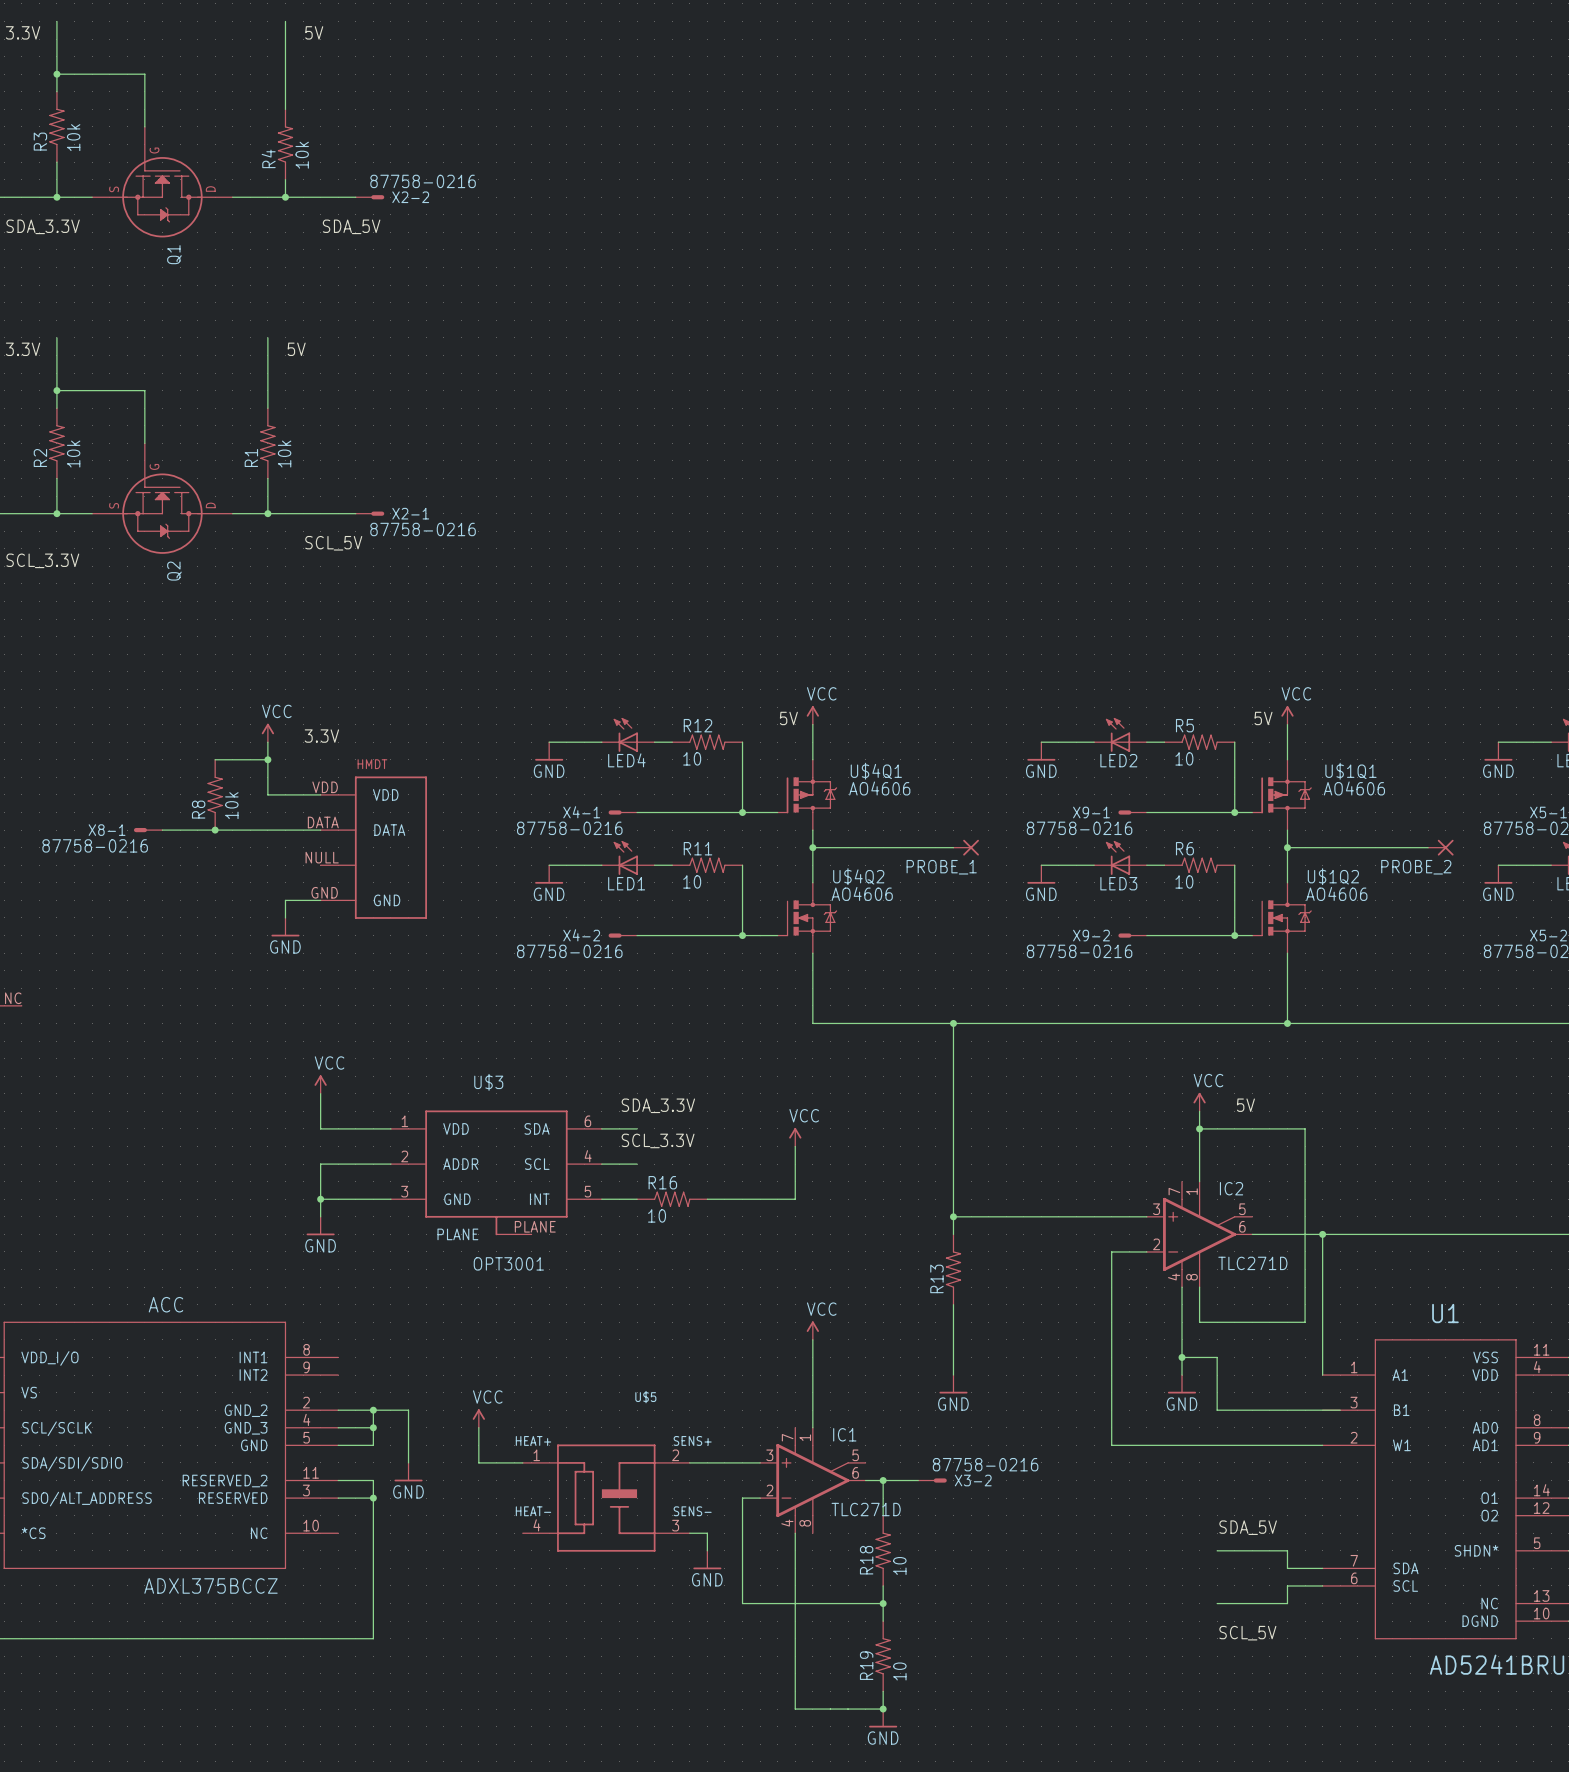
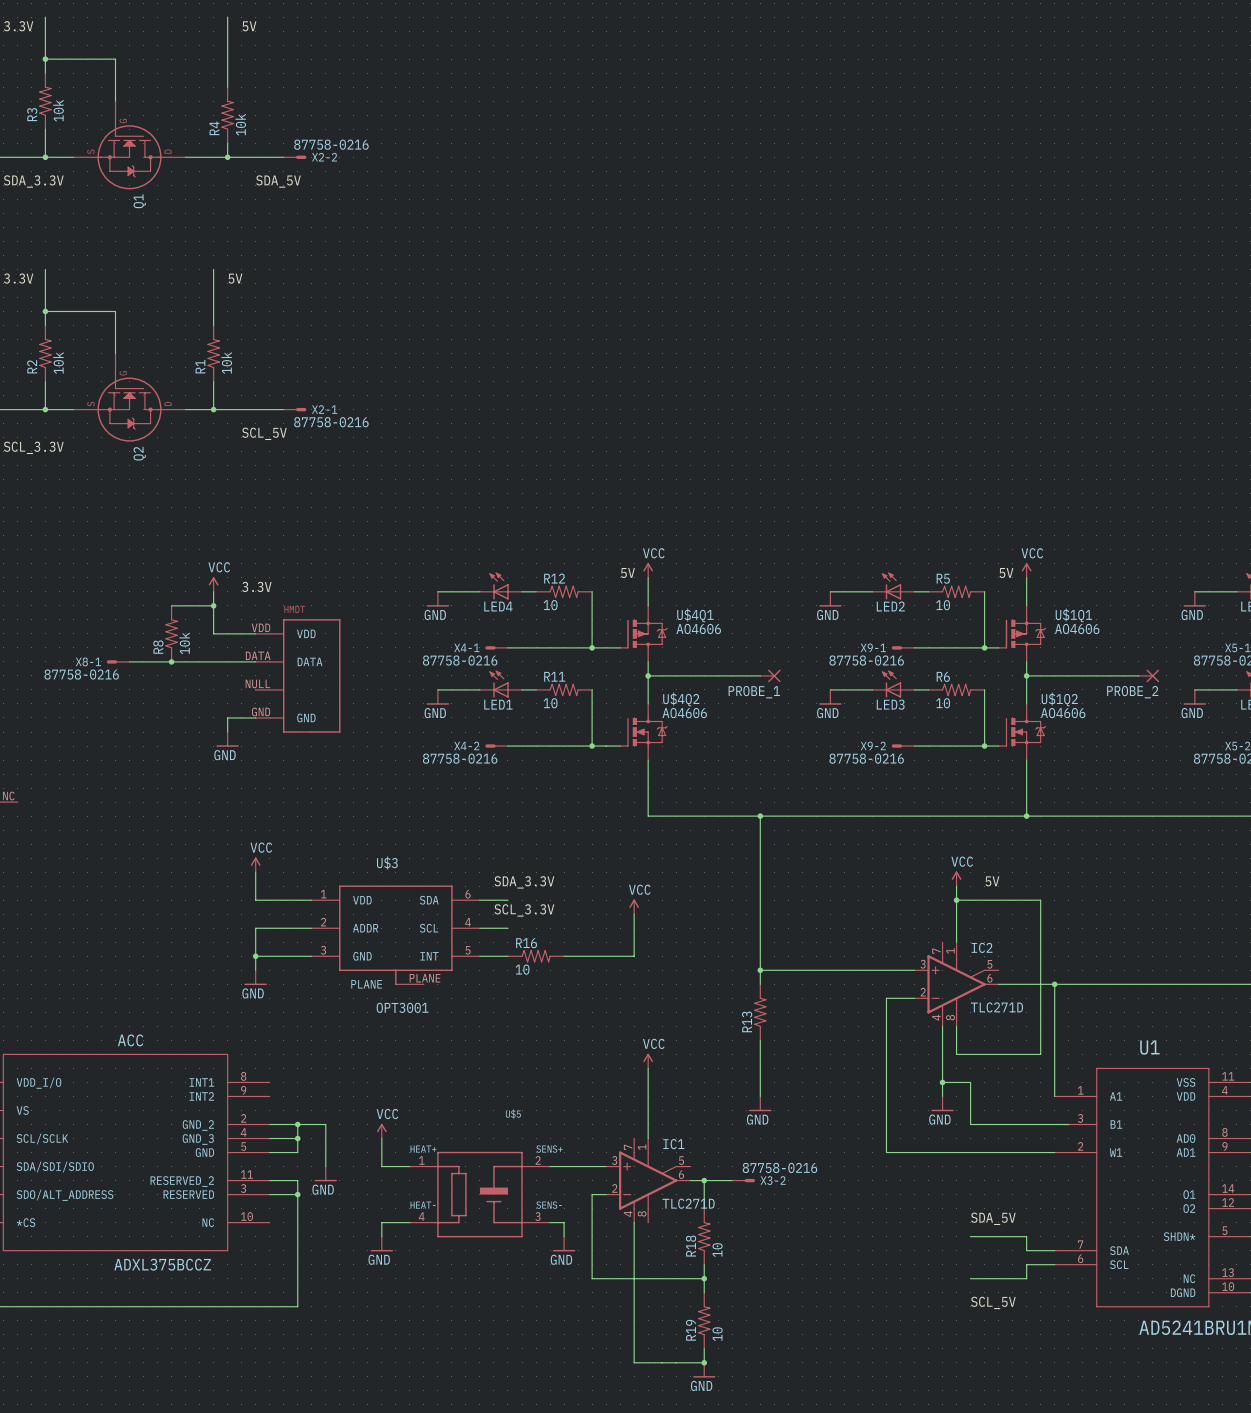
U$5 symbol: [522, 1444, 690, 1552] -> [409, 1151, 551, 1238]
wire: none -> (409, 1222) (381, 1222) (381, 1236)
power symbol: none -> GND (381, 1244)

